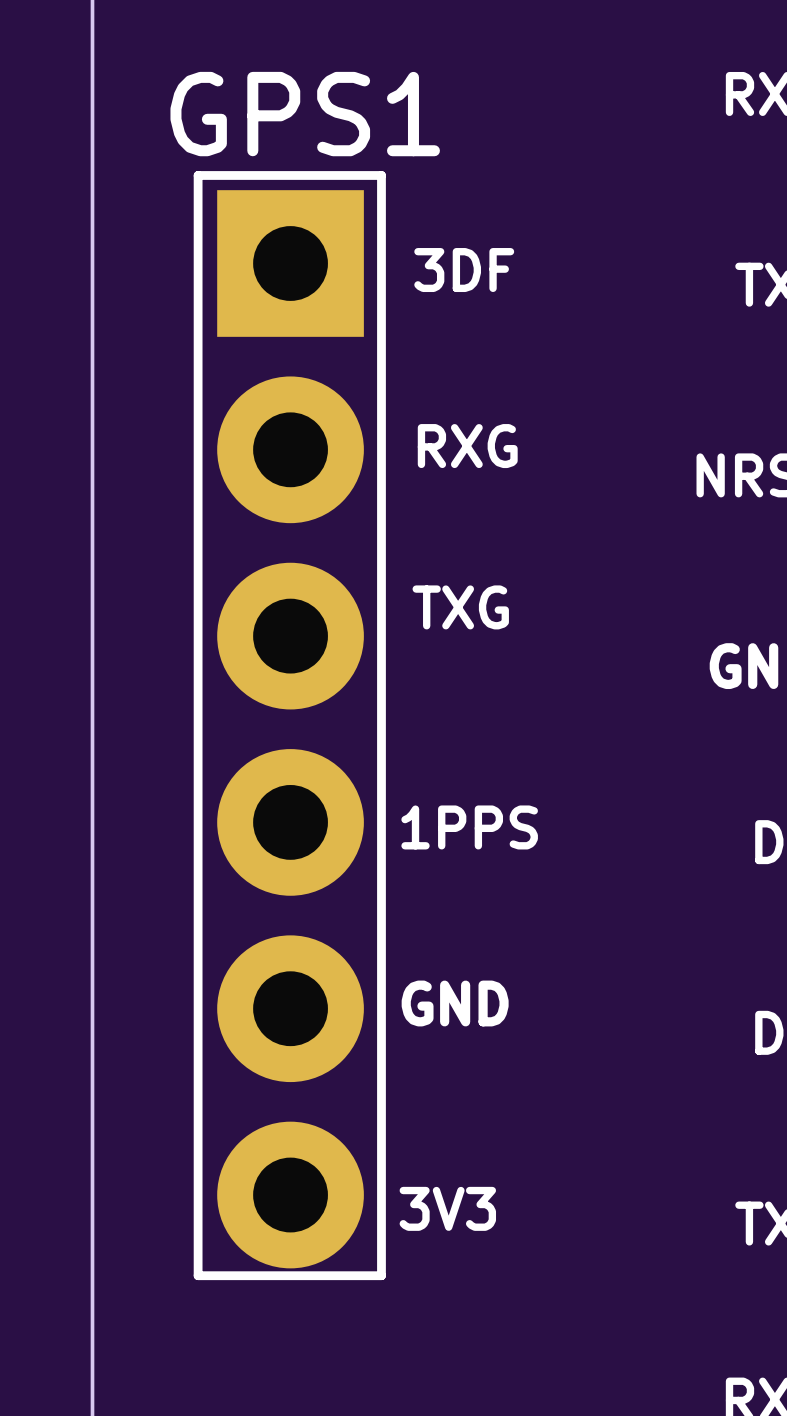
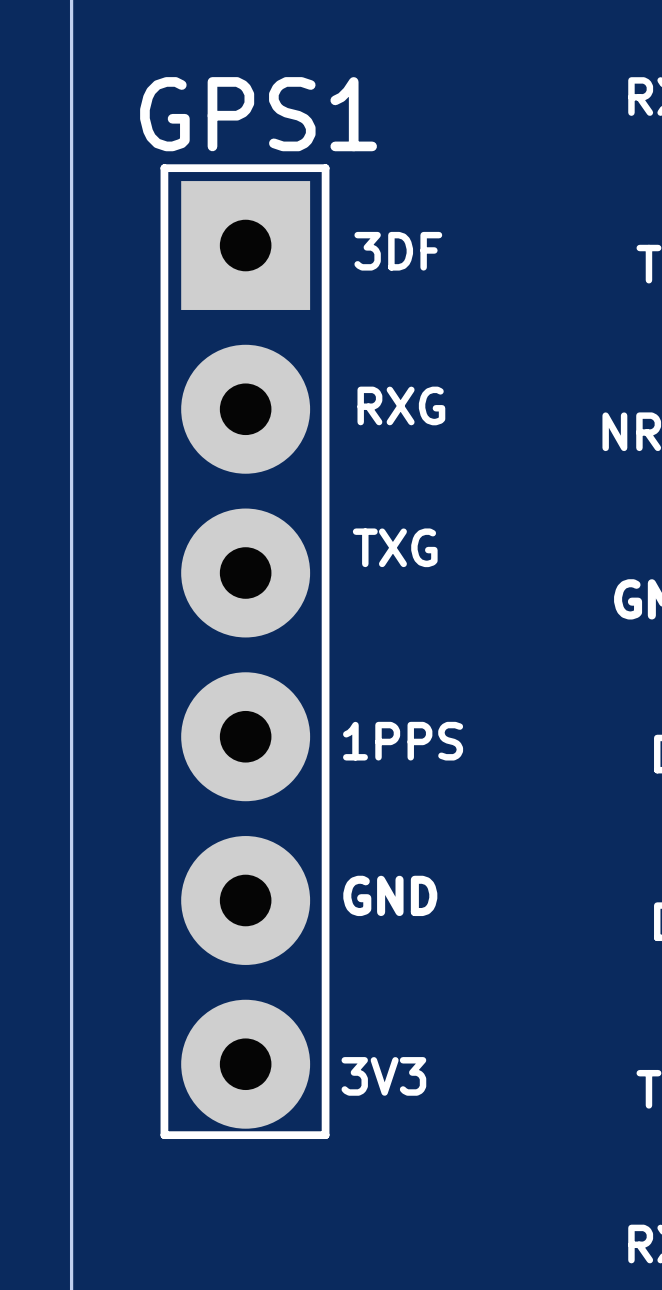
GPS1 footprint: [193, 171, 386, 1281] -> [160, 164, 330, 1140]

